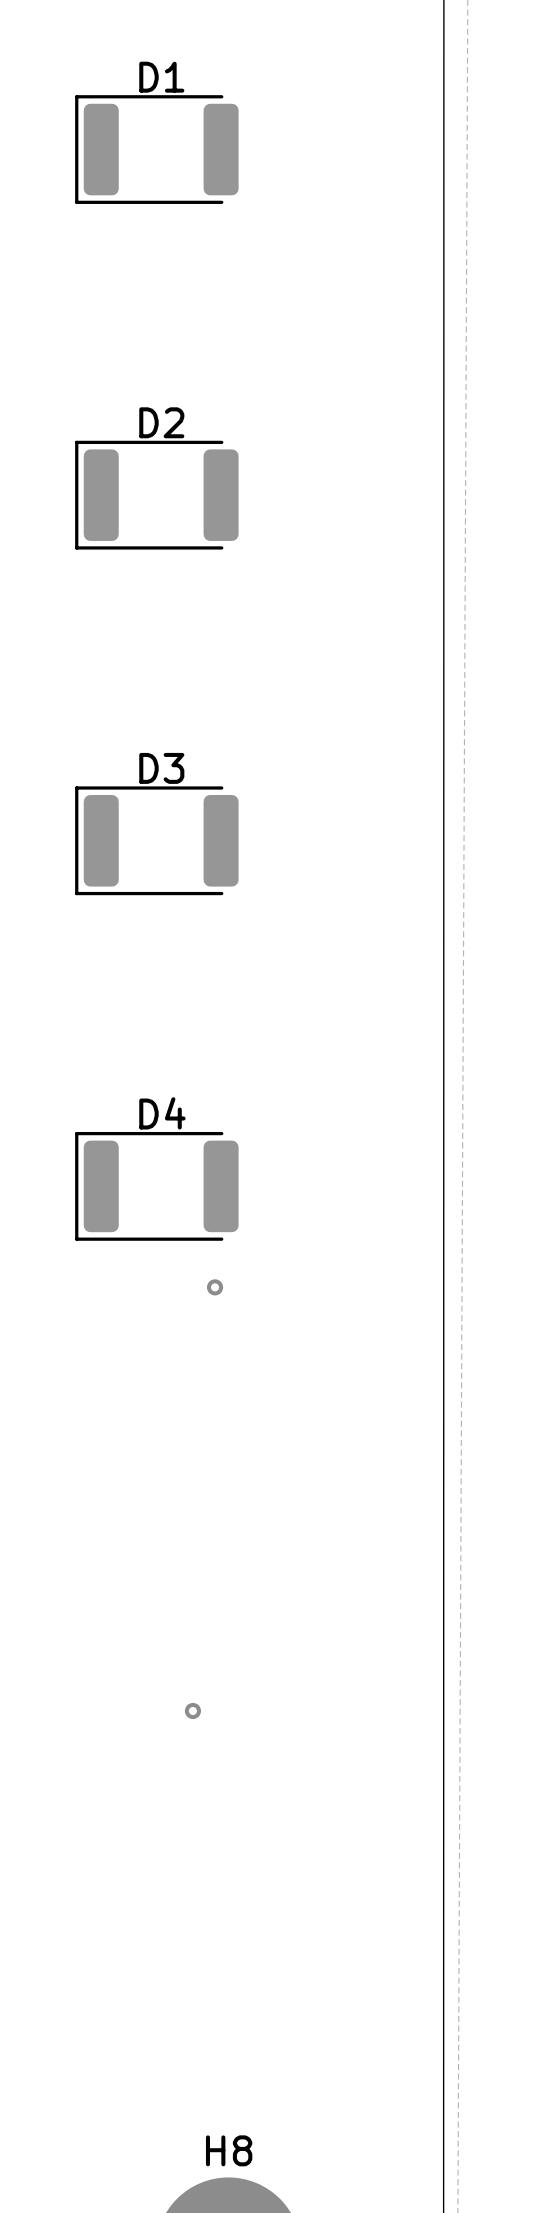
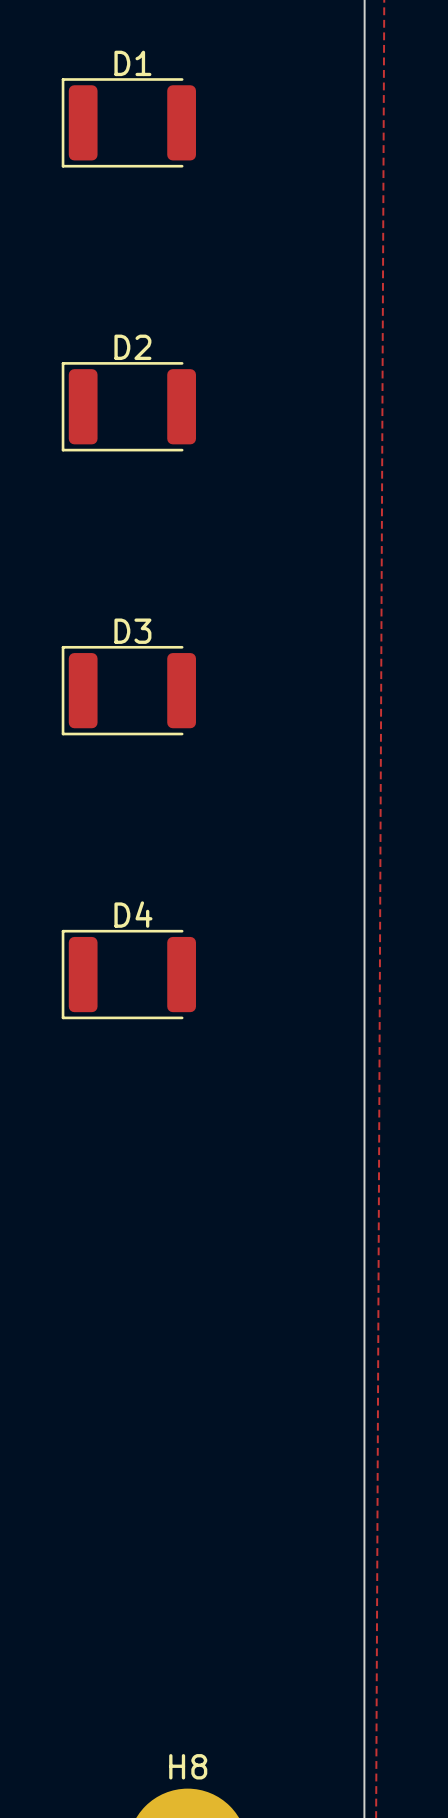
via: (215, 1287) -> none
via: (192, 1710) -> none

